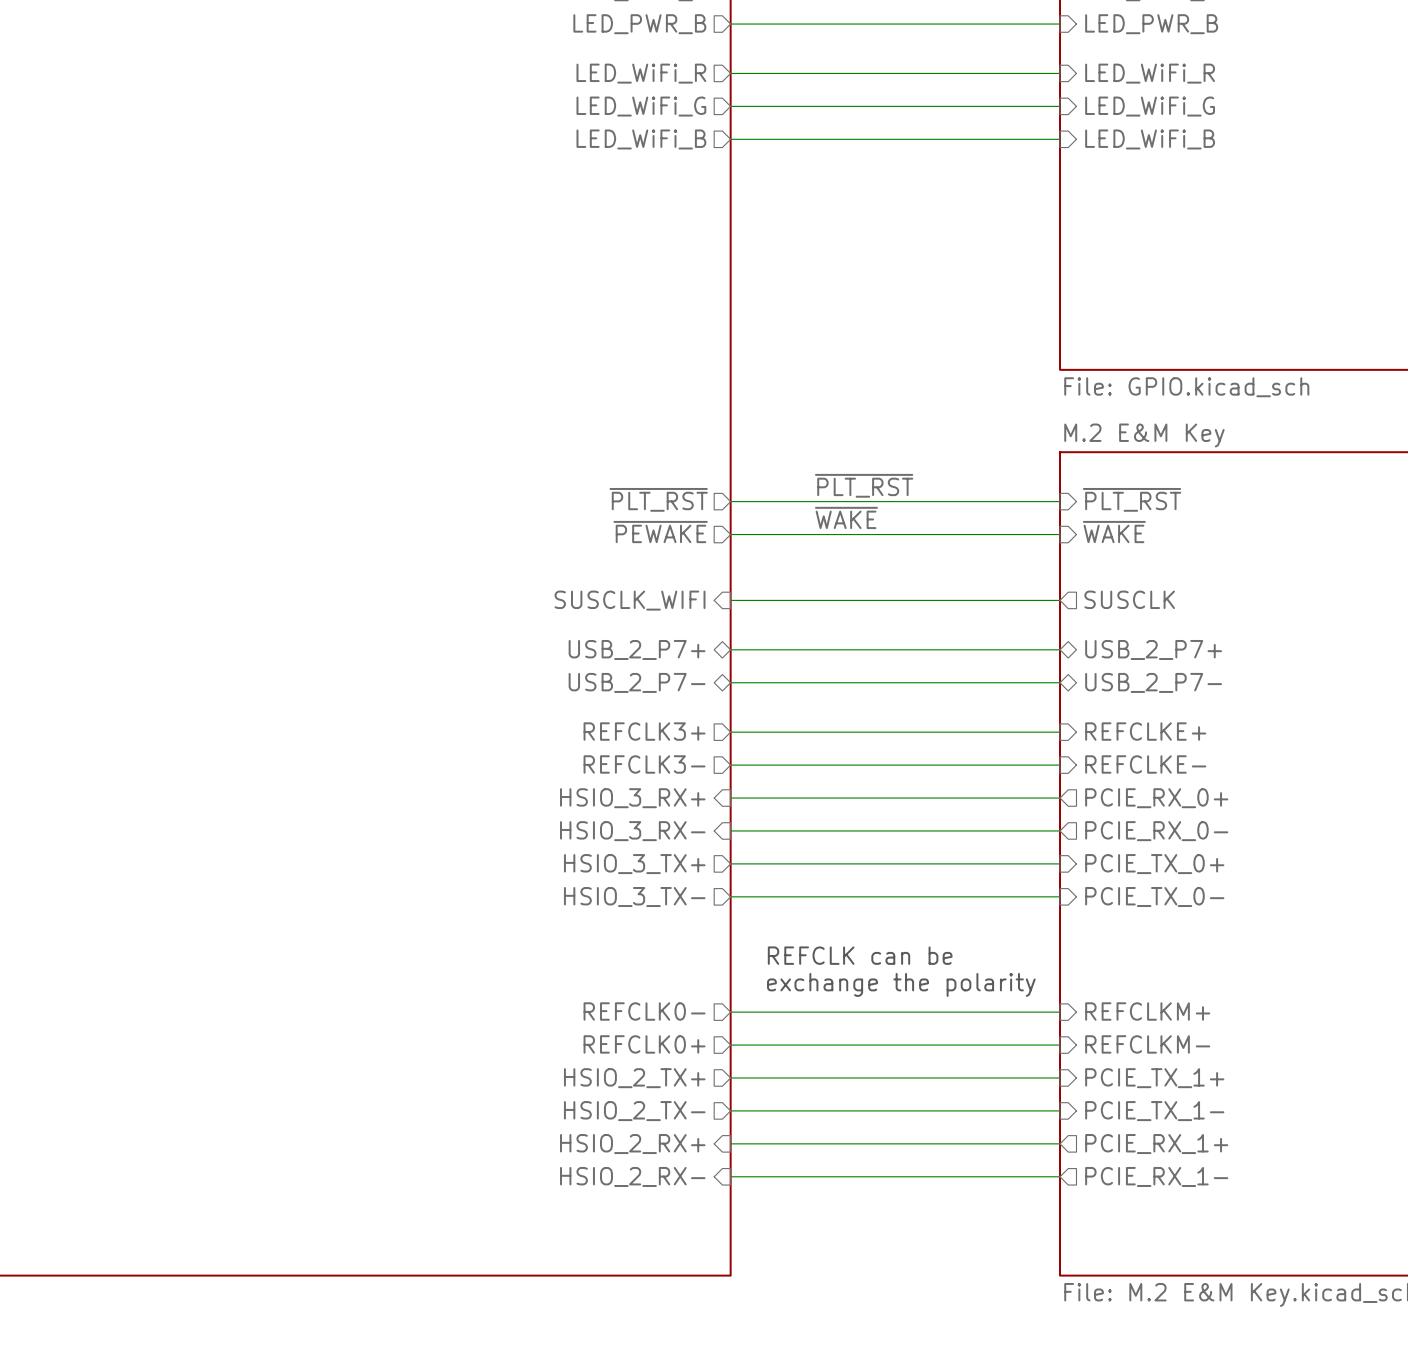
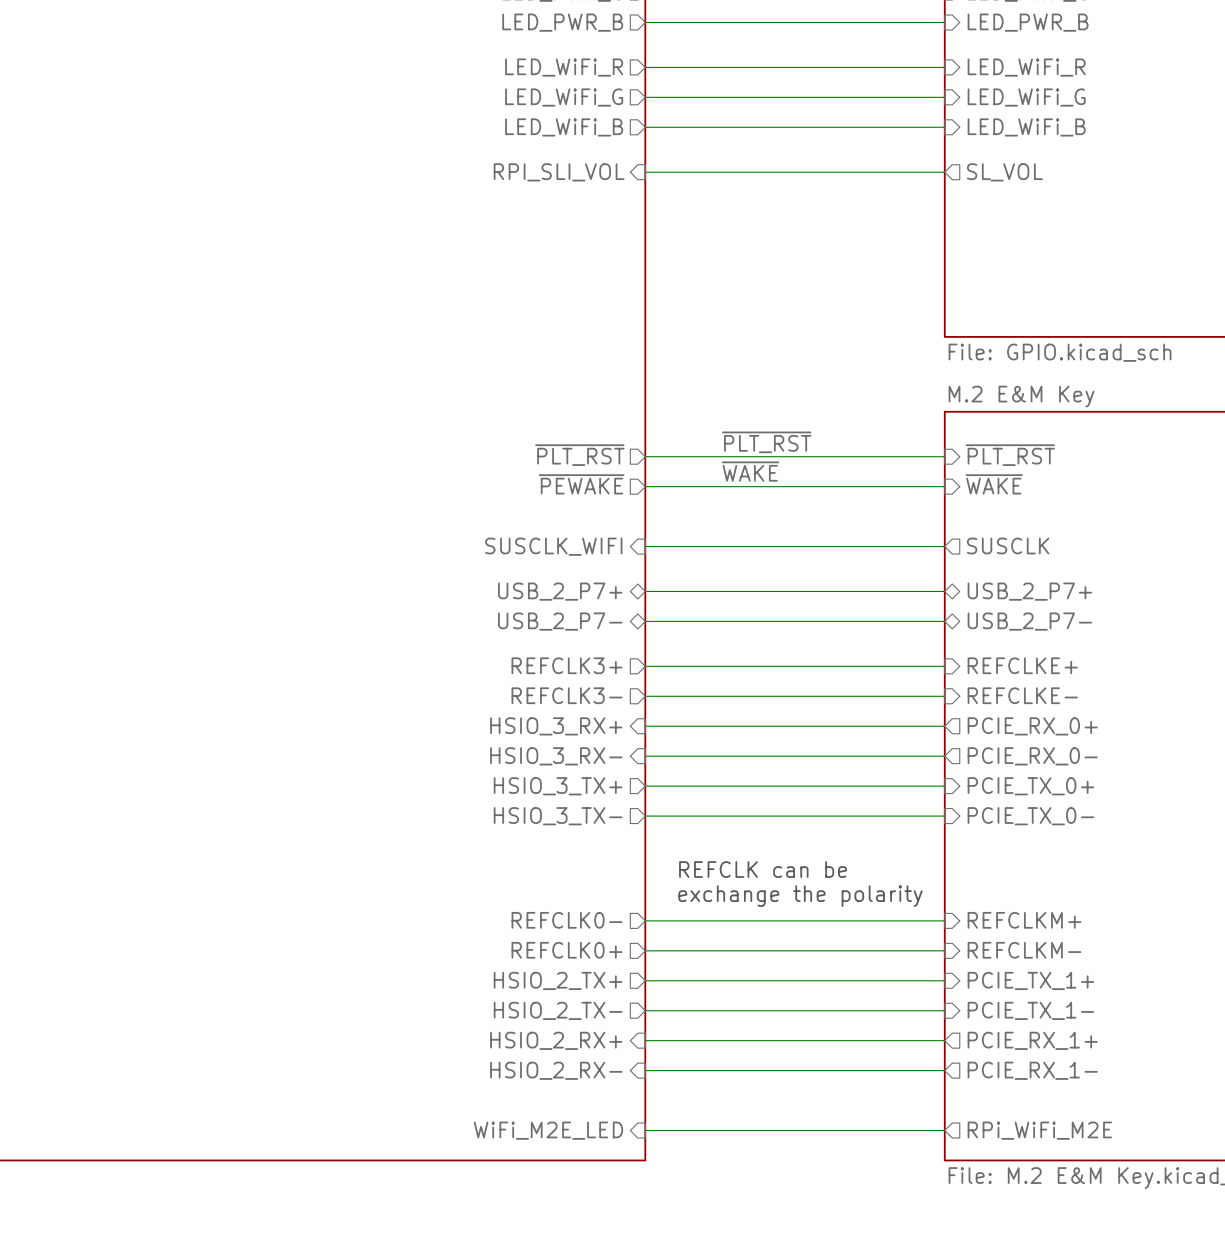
sheet pin: none -> RPI_SLI_VOL (559, 172)
wire: none -> (645, 172) (944, 172)
sheet pin: none -> SL_VOL (1004, 172)
sheet pin: none -> WiFi_M2E_LED (548, 1130)
wire: none -> (645, 1130) (944, 1130)
sheet pin: none -> RPi_WiFi_M2E (1039, 1130)

